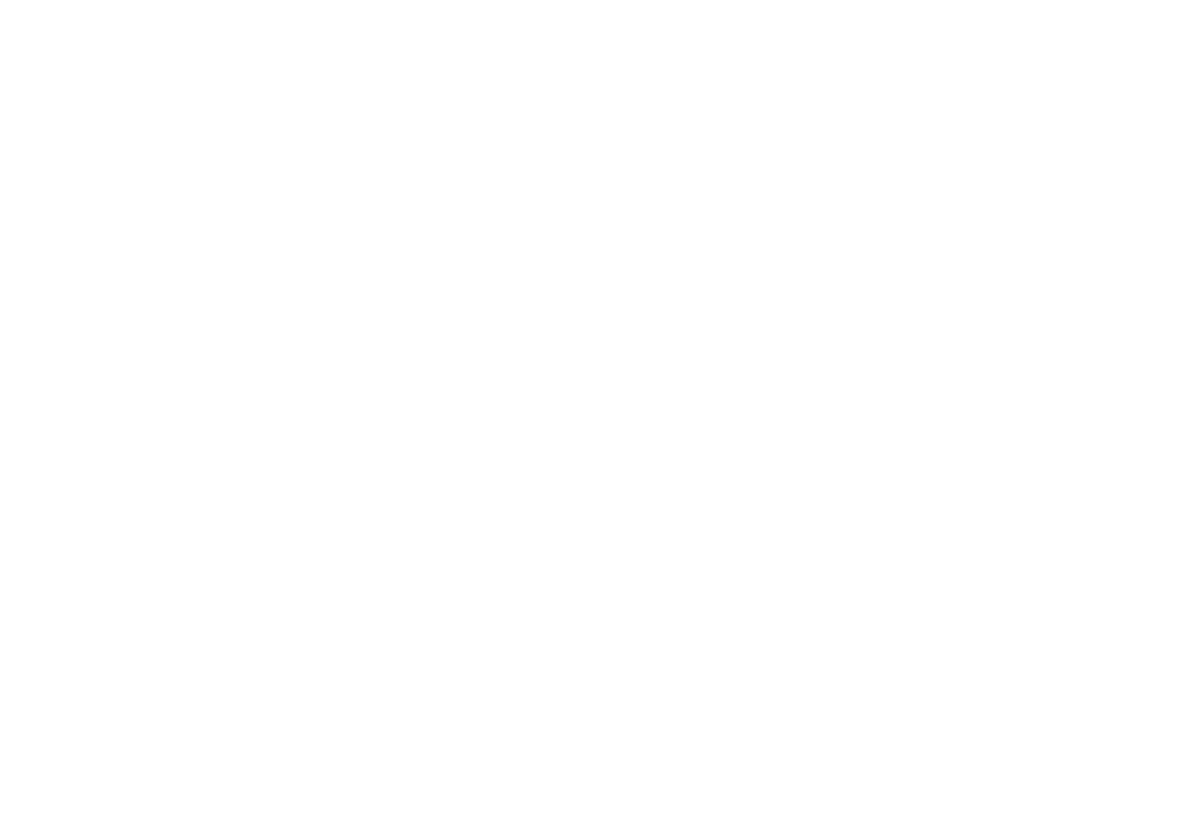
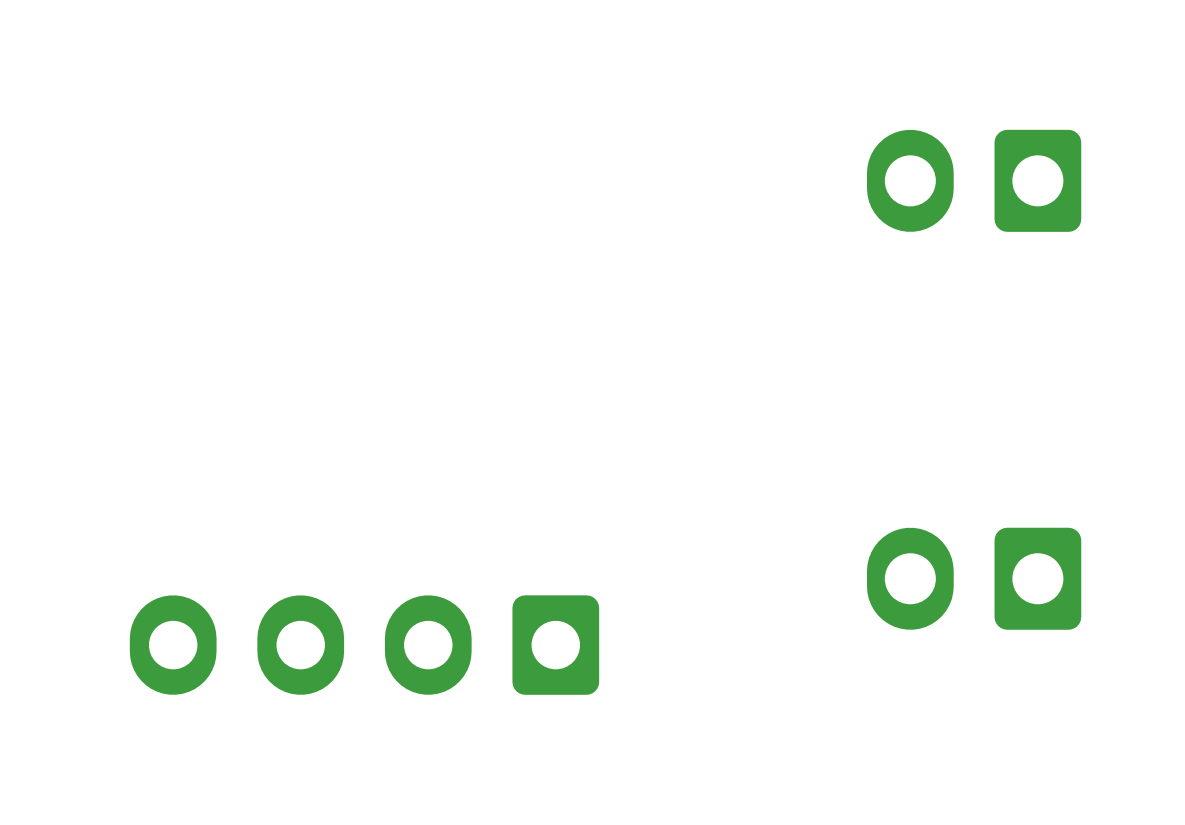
part: none -> (974, 180)
part: none -> (974, 578)
part: none -> (364, 645)

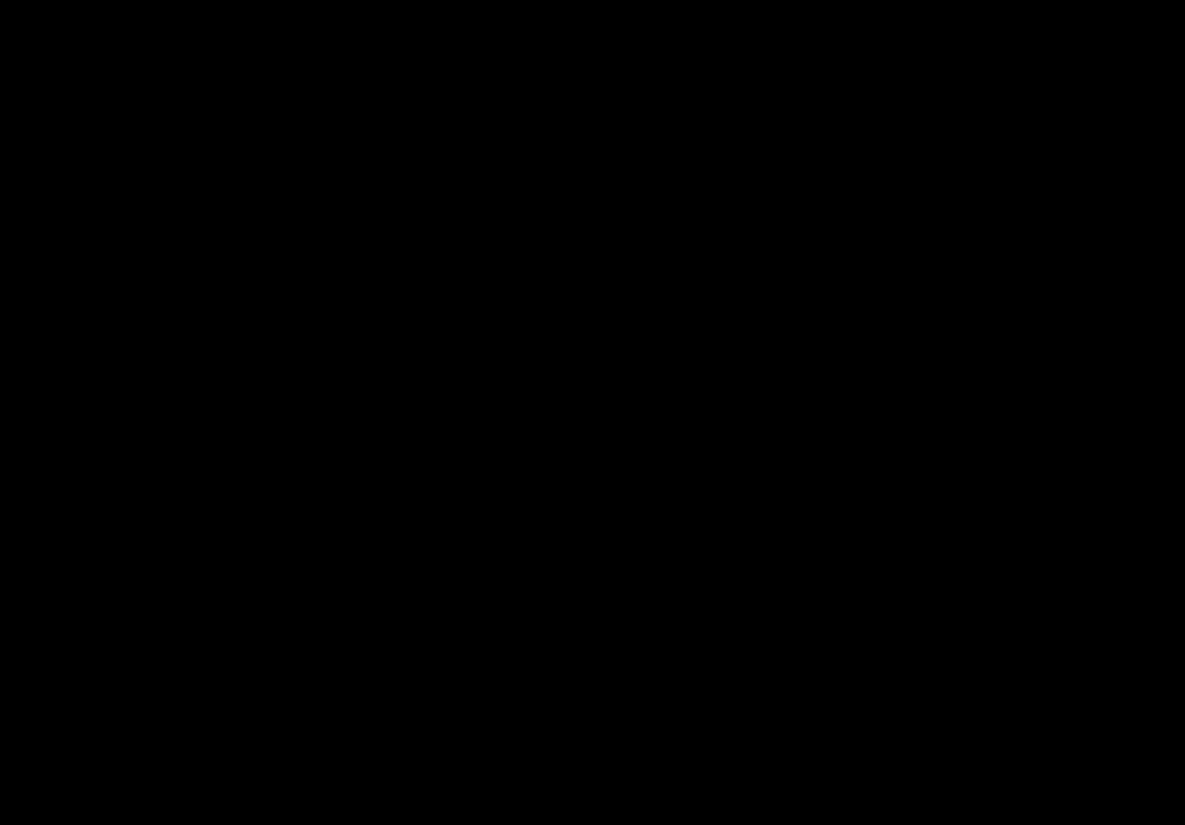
part: (974, 180) -> none
part: (974, 578) -> none
part: (364, 645) -> none

